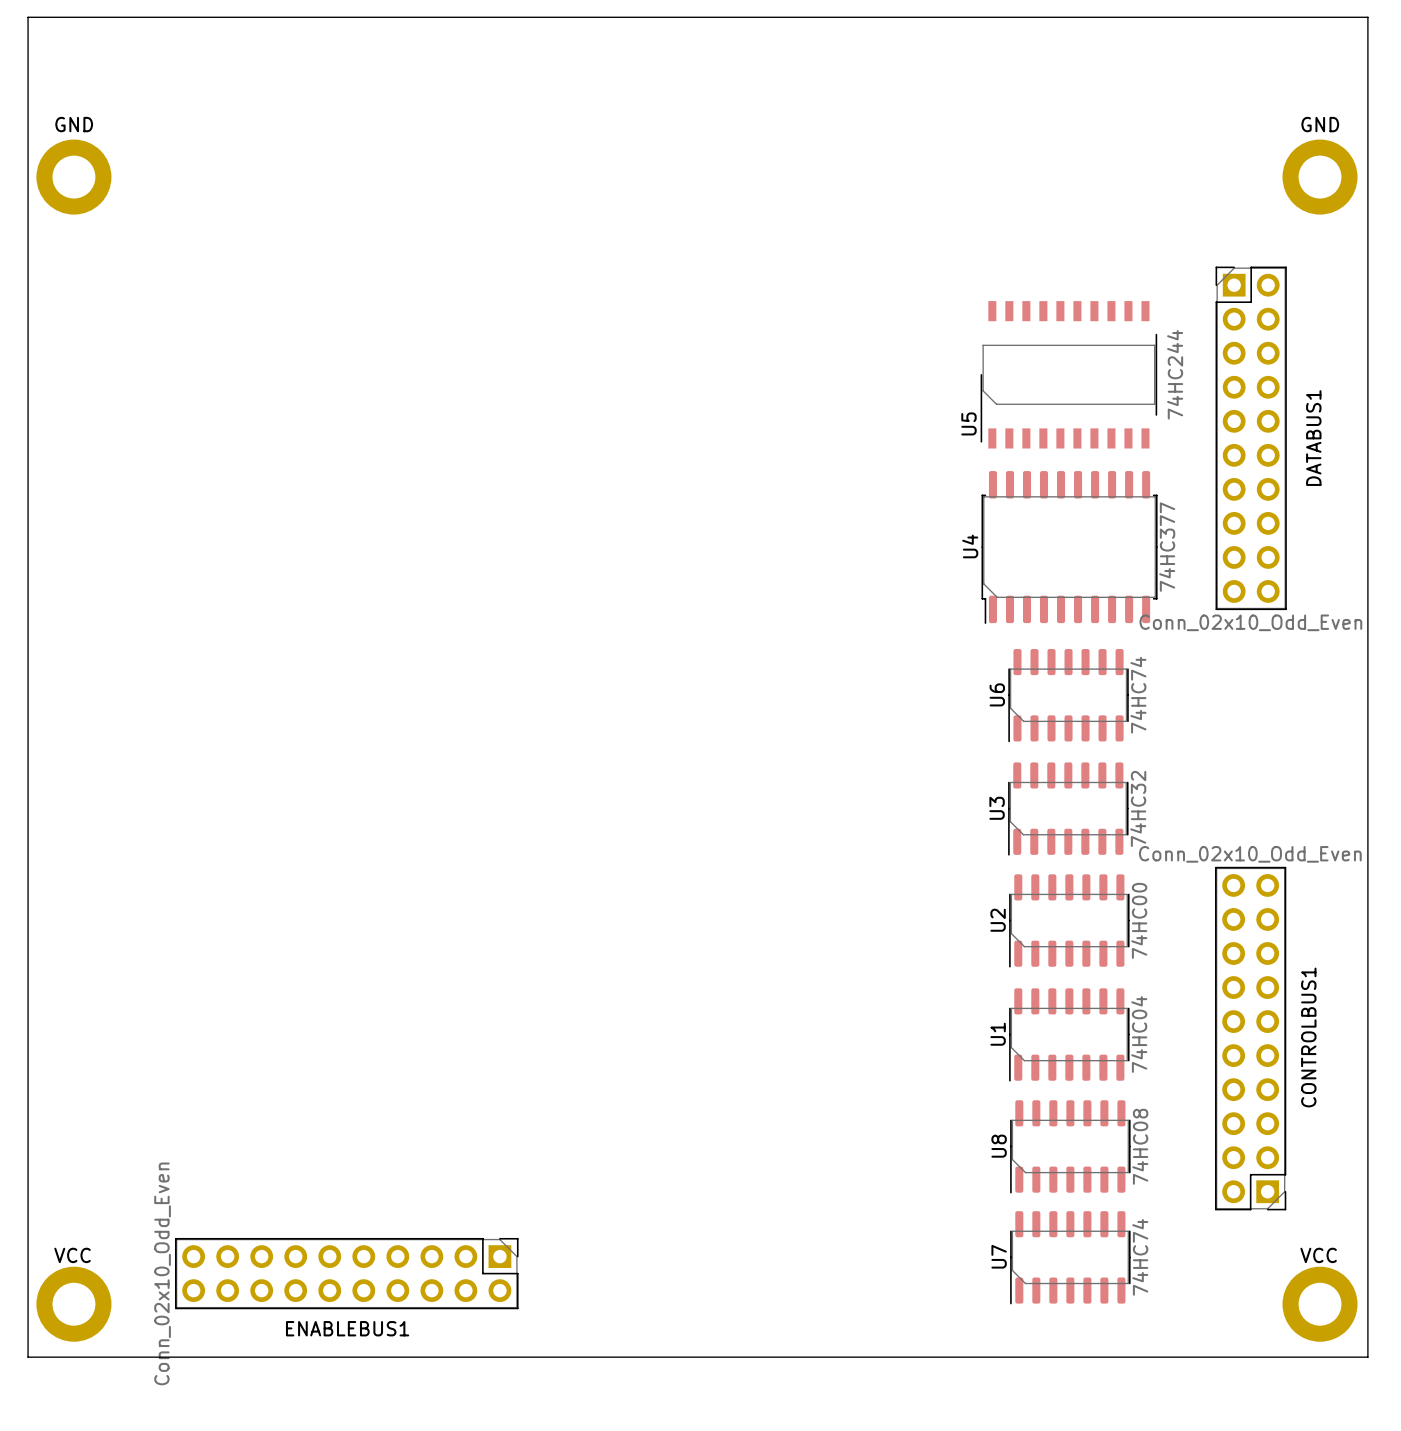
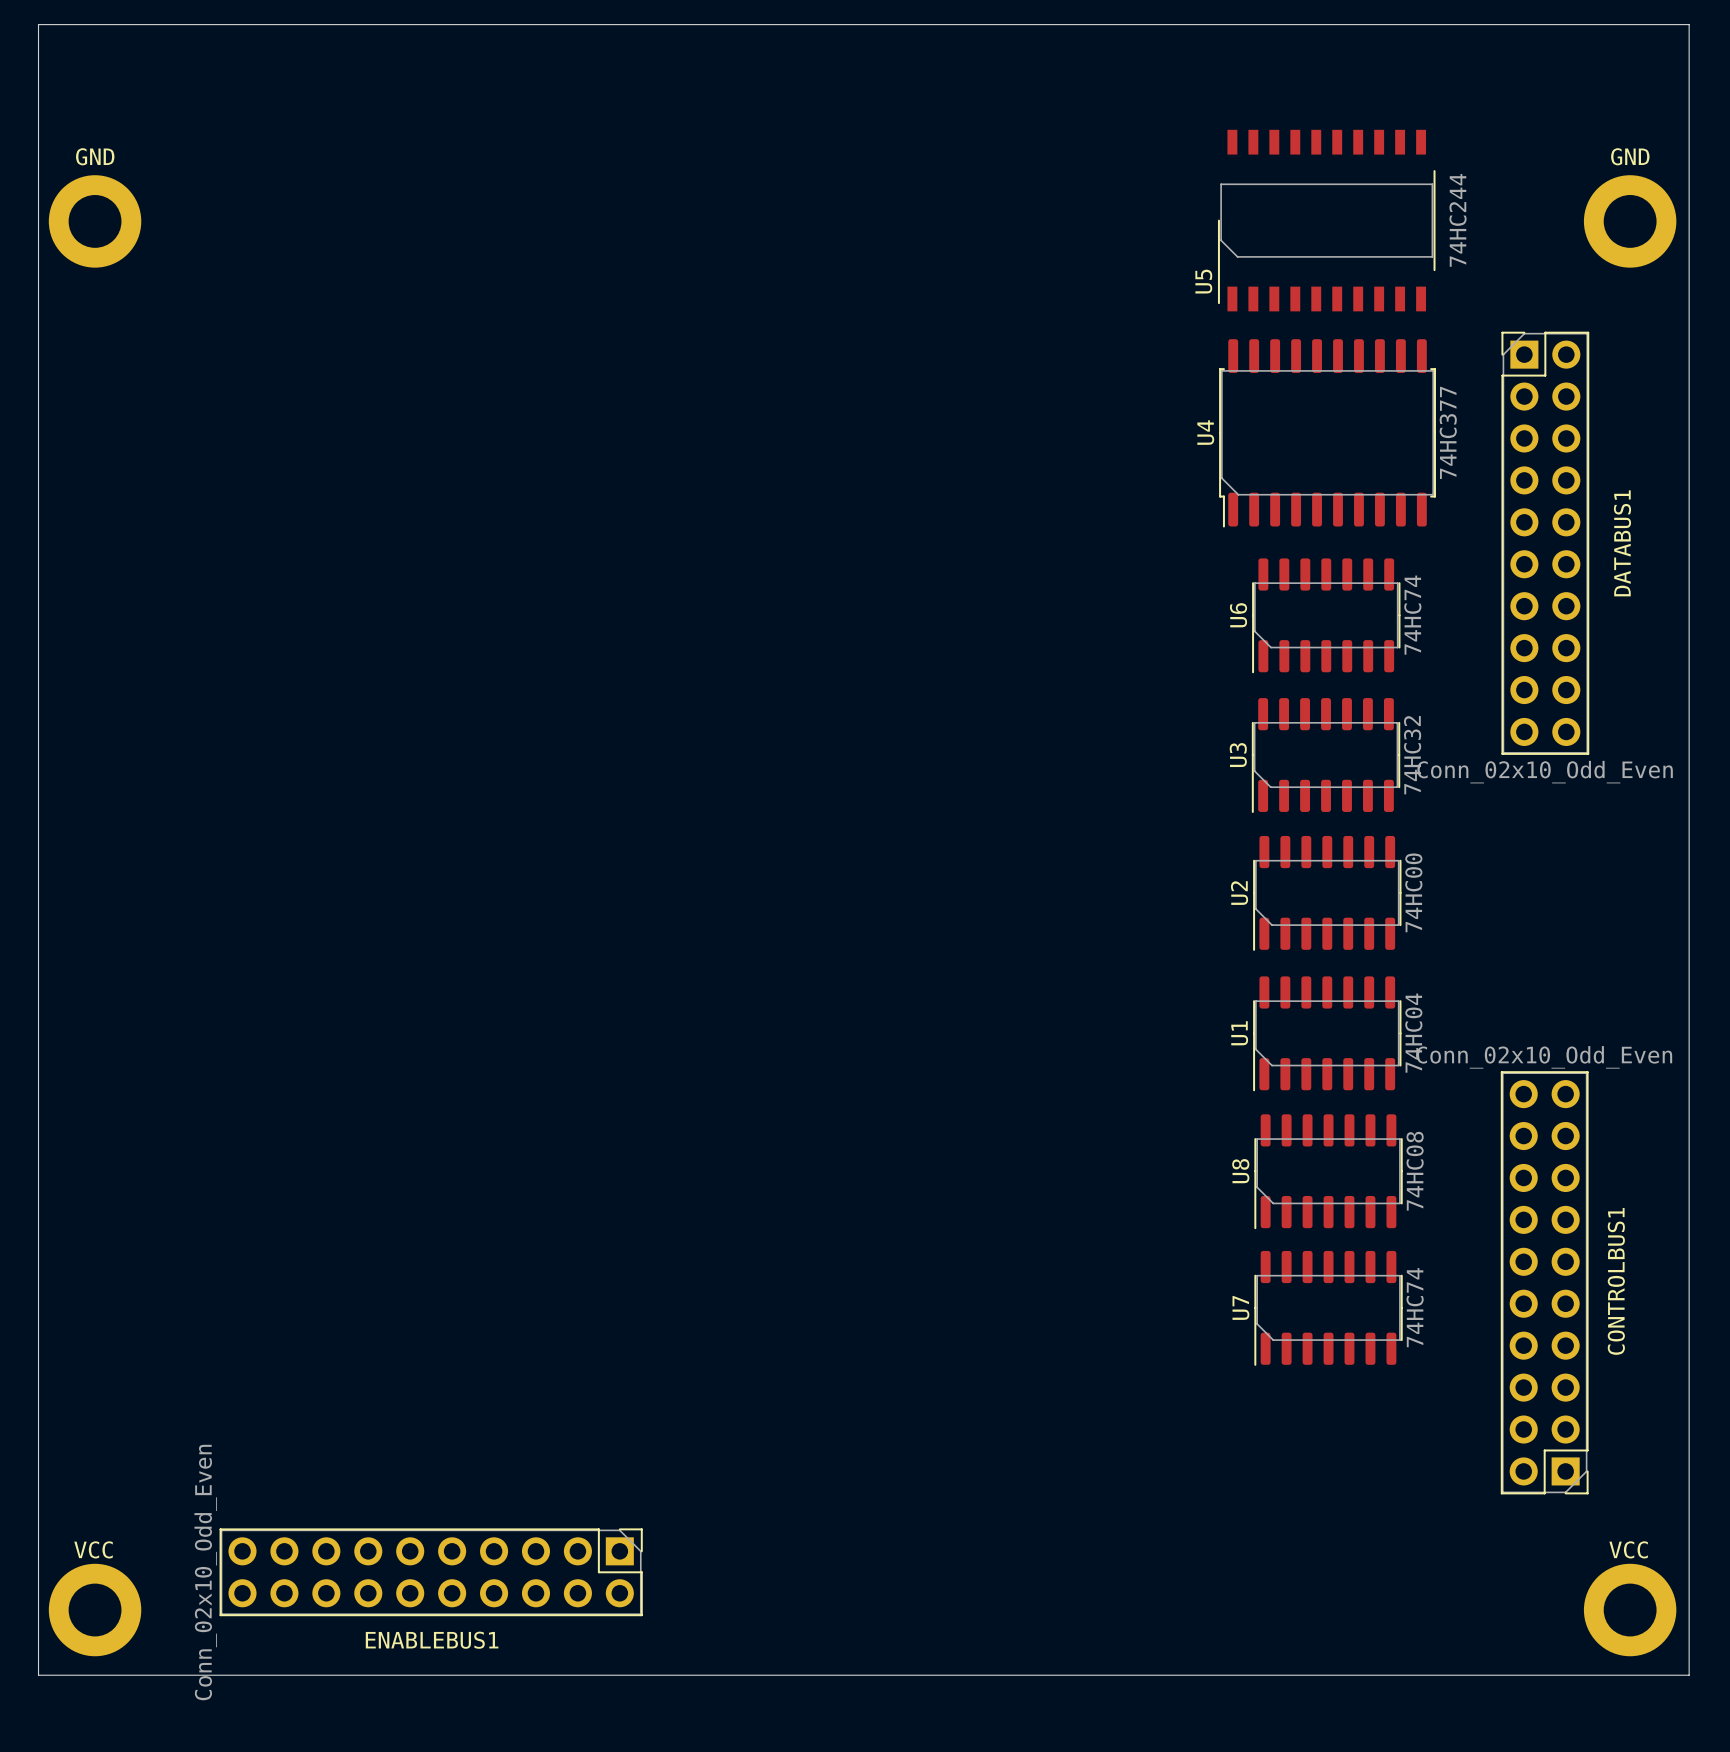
U5 position: (1068, 374) -> (1326, 220)
U4 position: (1069, 547) -> (1327, 433)
U6 position: (1068, 695) -> (1326, 615)
U3 position: (1068, 809) -> (1326, 755)
U2 position: (1069, 920) -> (1327, 893)
U1 position: (1069, 1034) -> (1327, 1033)
U8 position: (1070, 1146) -> (1328, 1171)
U7 position: (1070, 1257) -> (1328, 1308)

